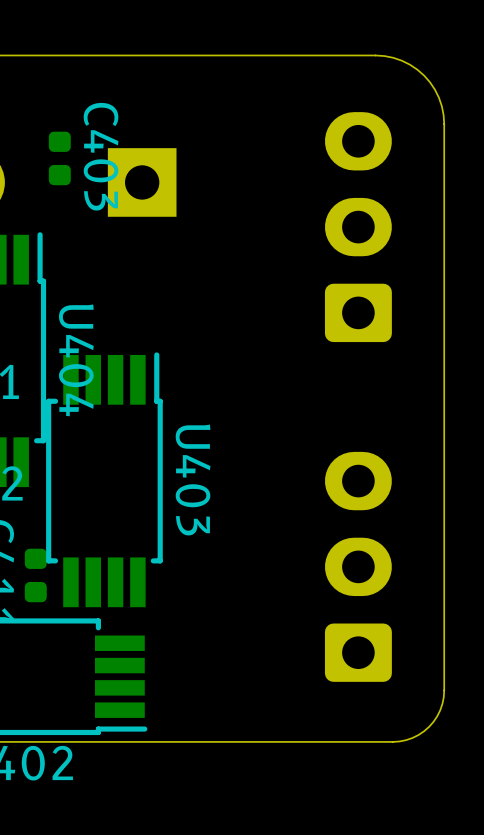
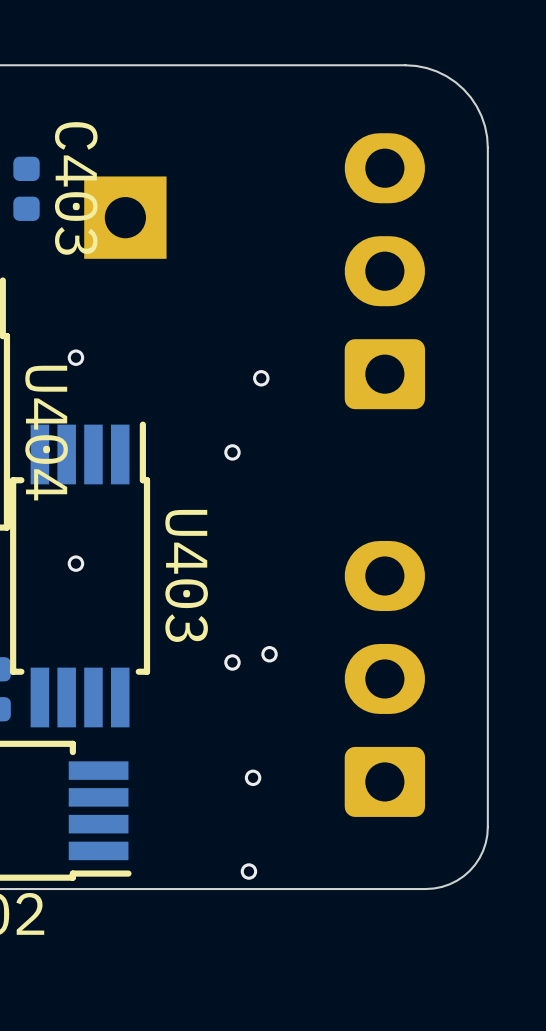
via: none -> (75, 357)
via: none -> (261, 378)
via: none -> (232, 452)
via: none -> (75, 563)
via: none -> (269, 654)
via: none -> (232, 662)
via: none -> (253, 777)
via: none -> (248, 871)

